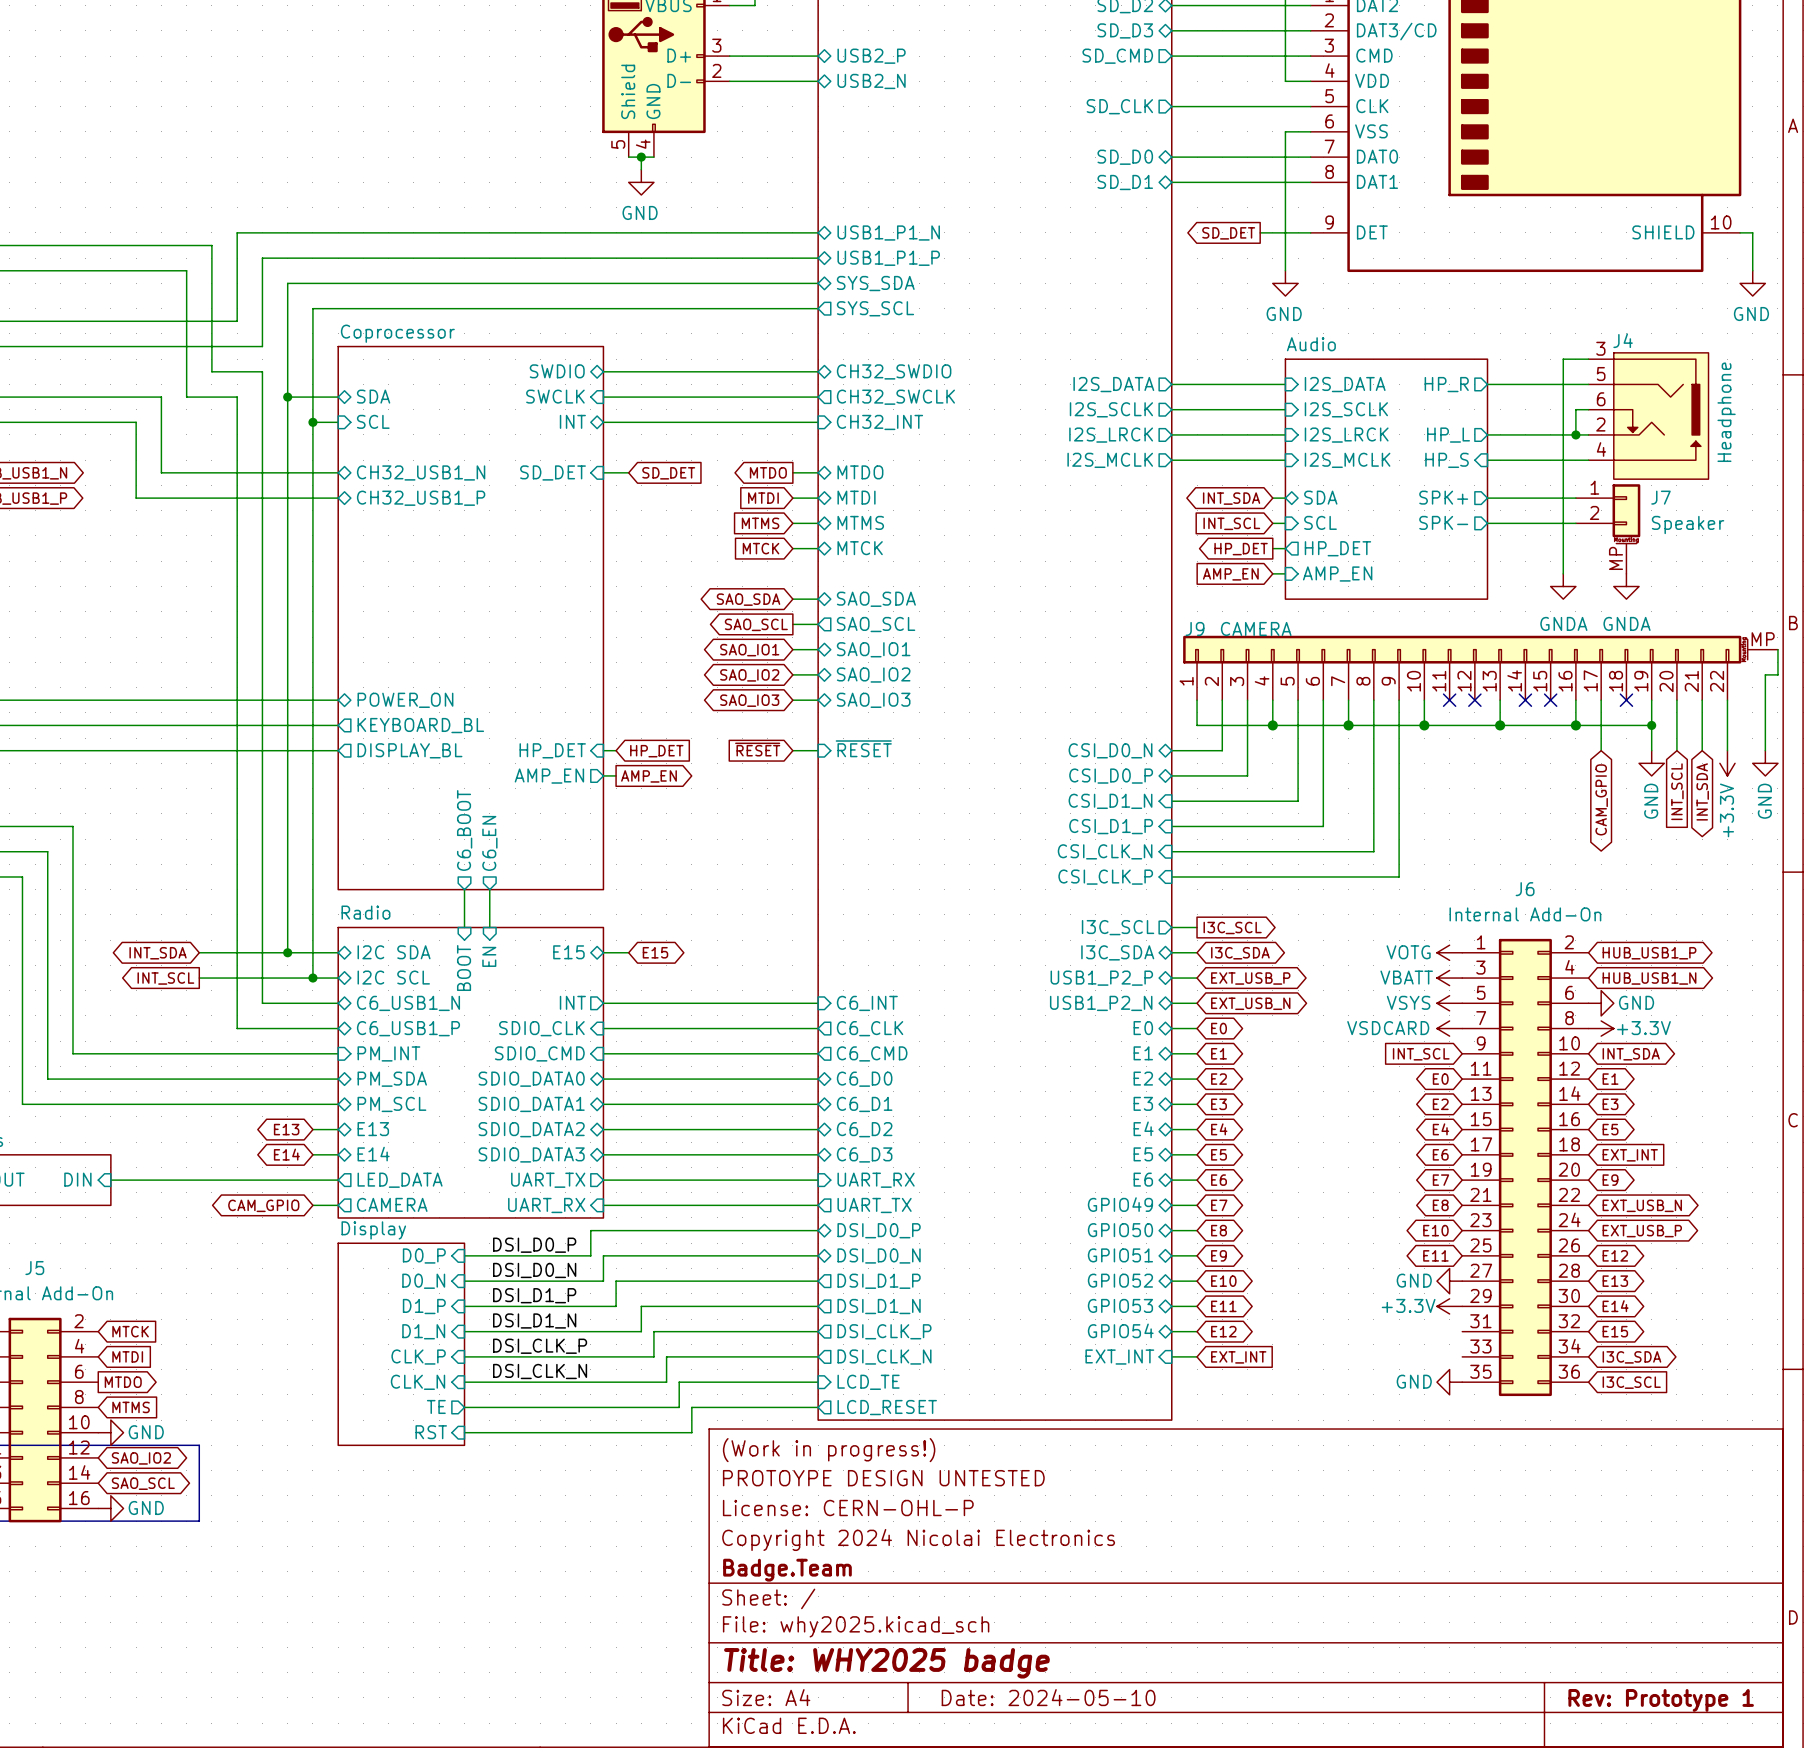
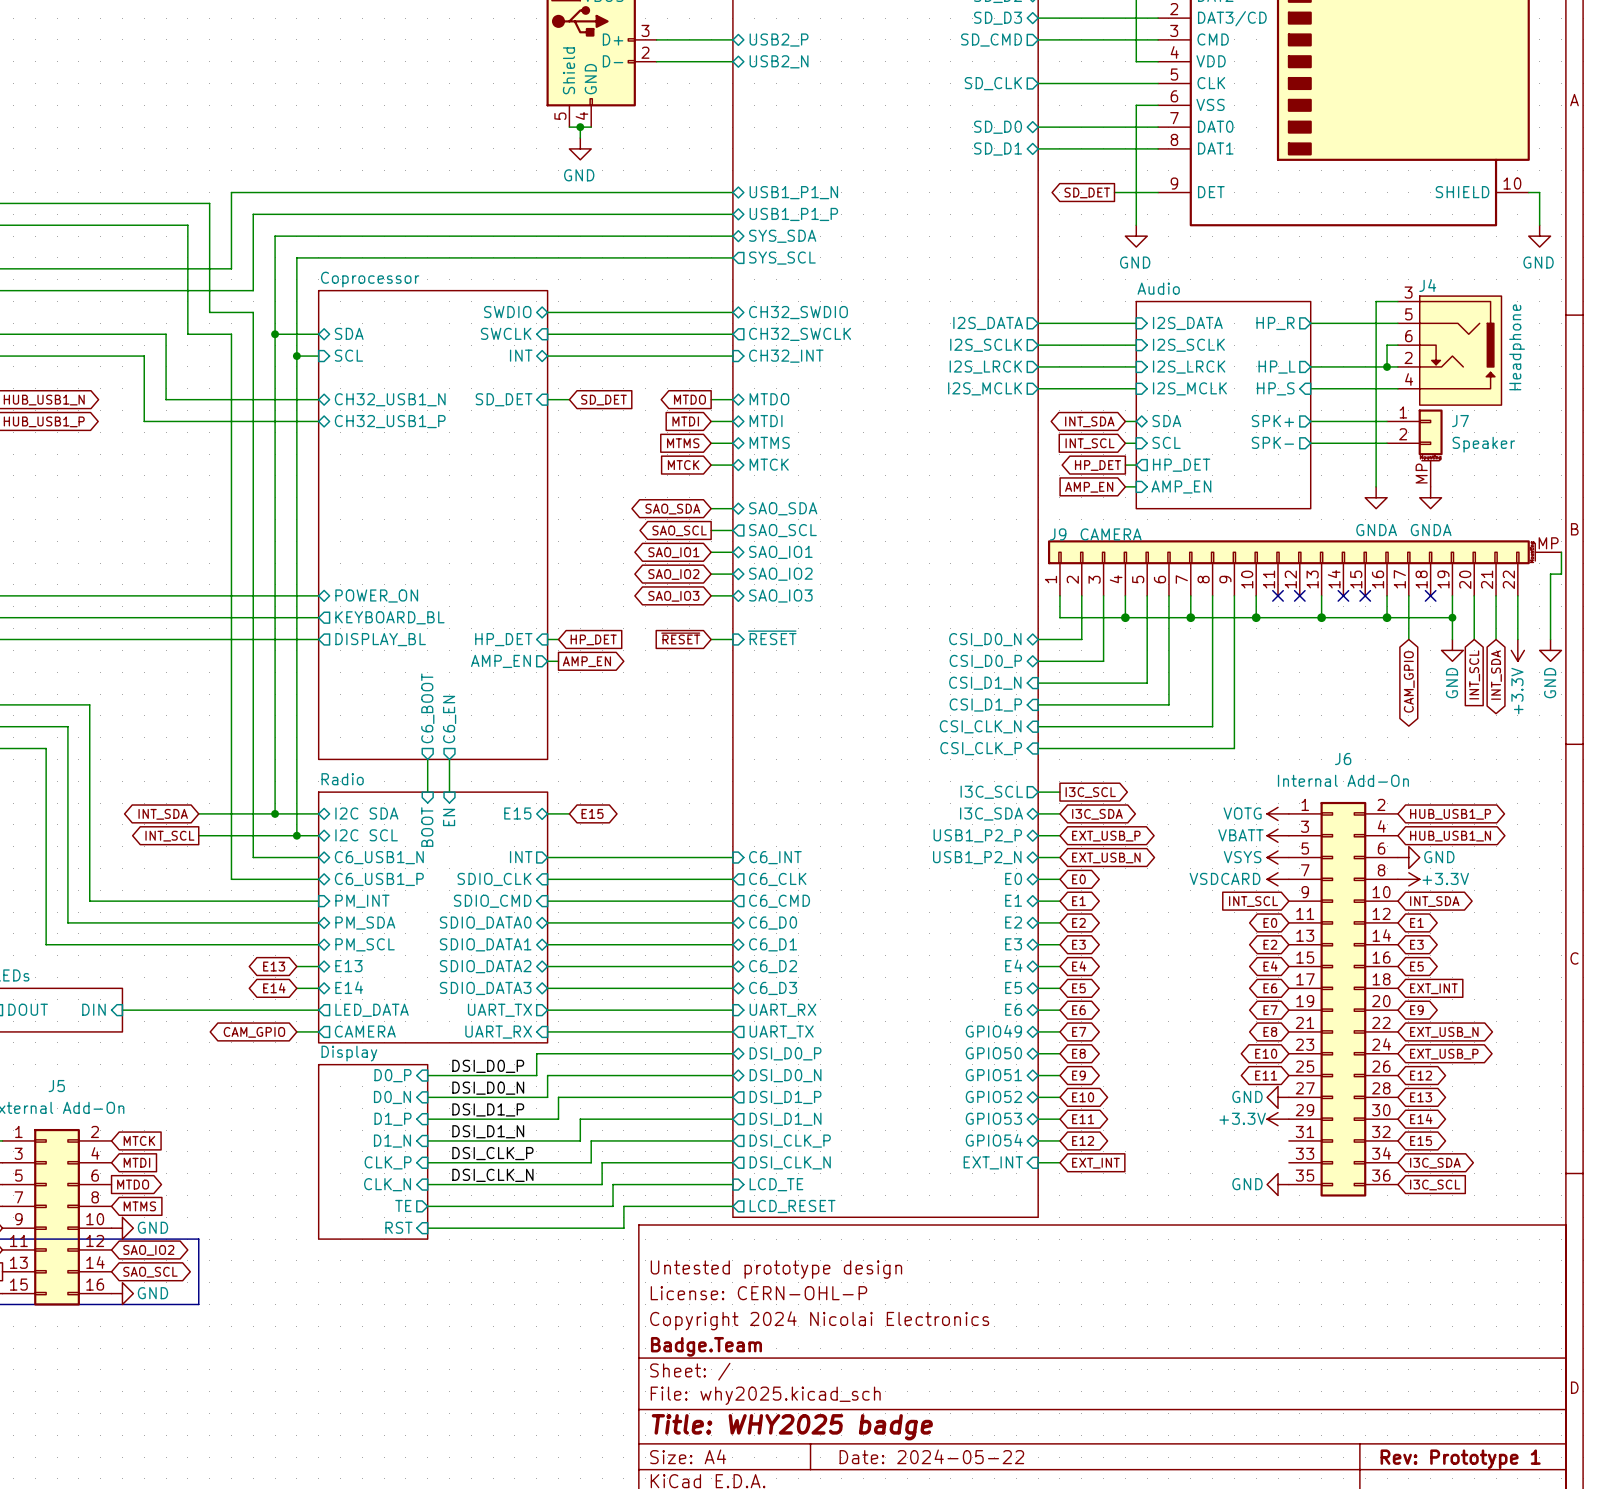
title block: (Work in progress!) (829, 1450) -> none
title block: PROTOYPE DESIGN UNTESTED (883, 1478) -> Untested prototype design (776, 1269)
title block: Date: 2024-05-10 (1048, 1697) -> Date: 2024-05-22 (931, 1456)

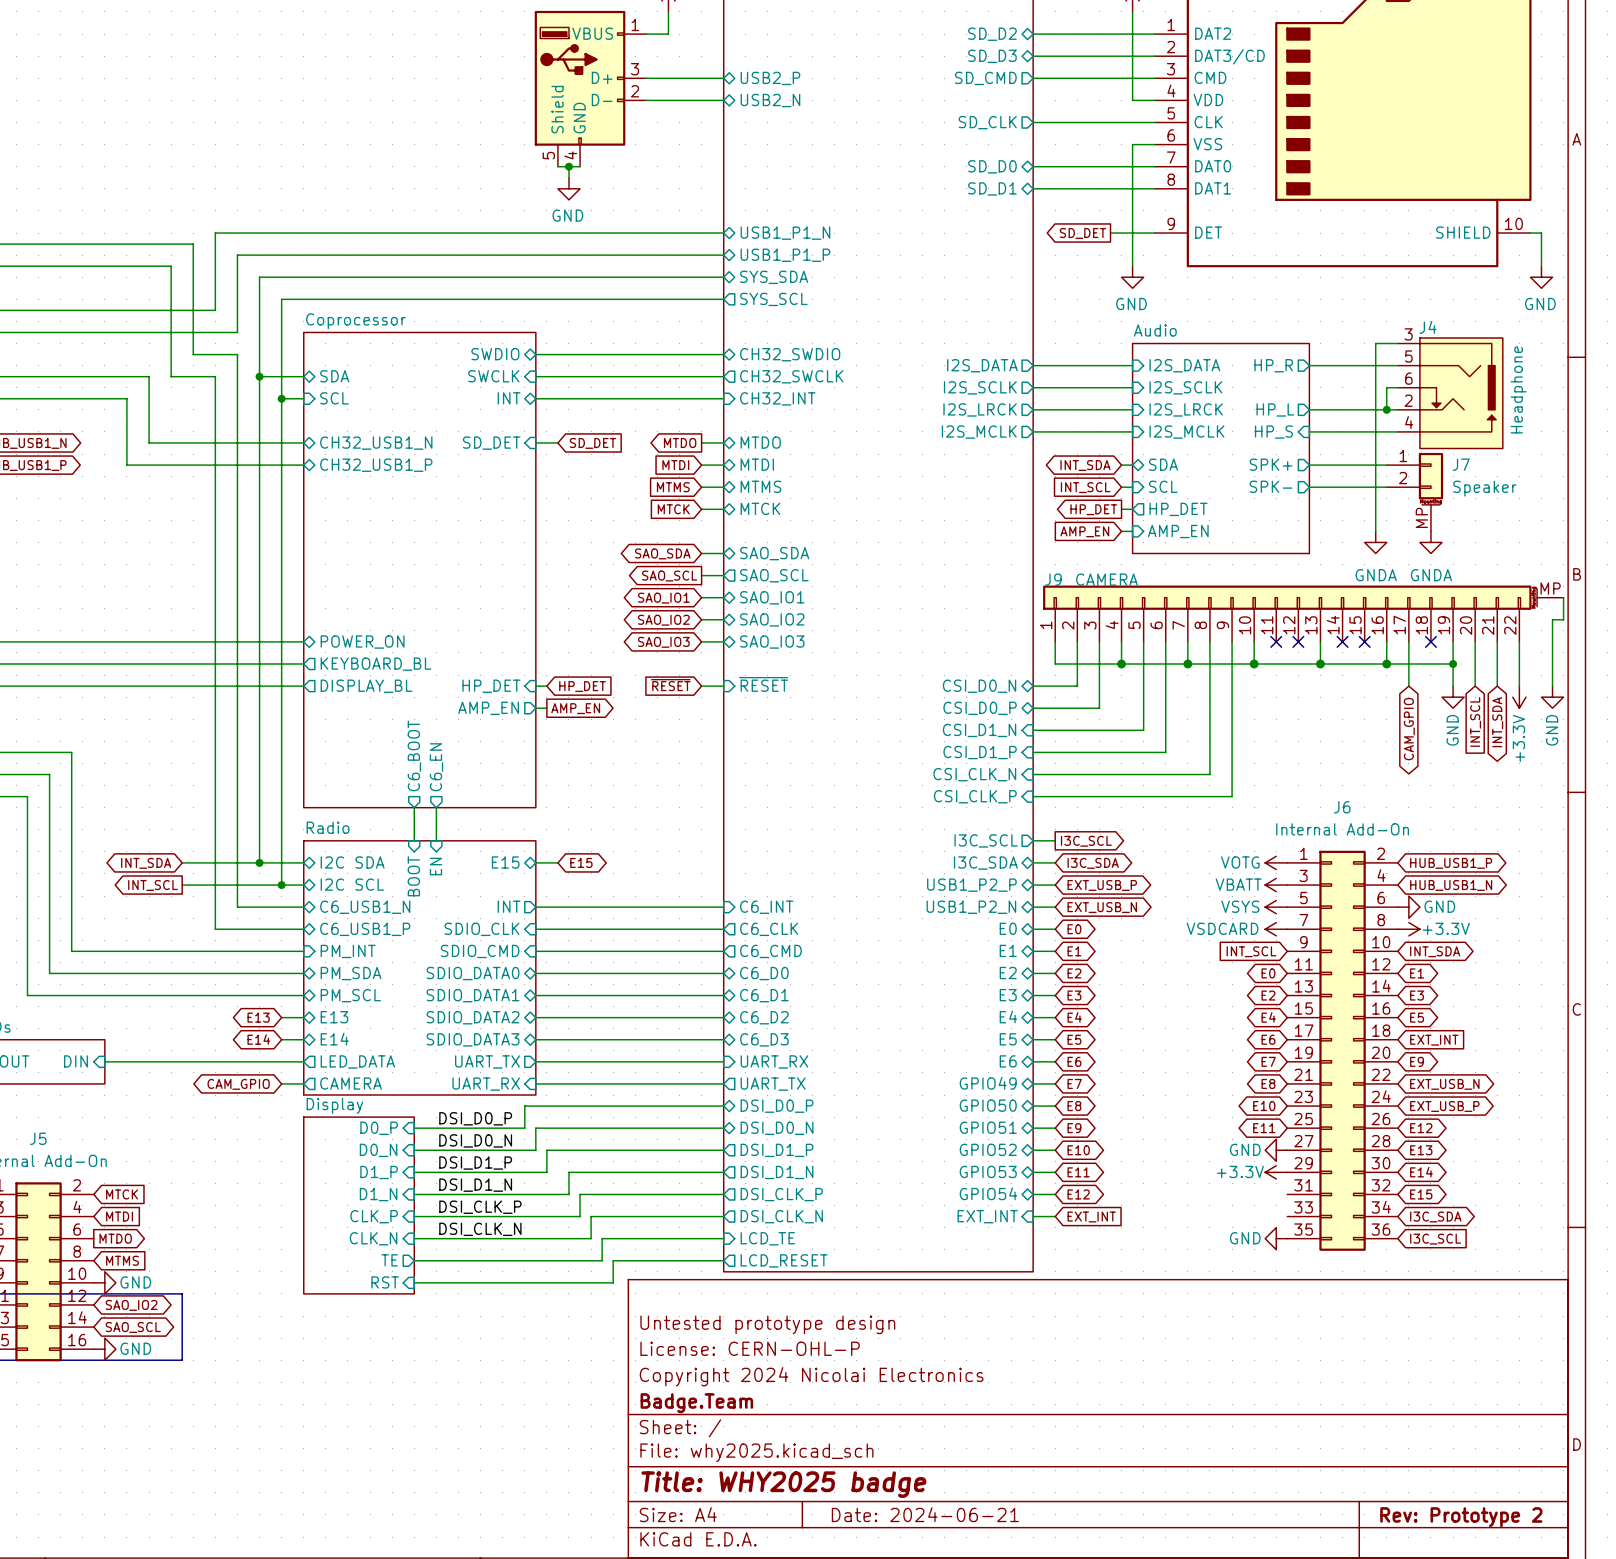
title block: Date: 2024-05-22 (931, 1456) -> Date: 2024-06-21 (925, 1514)
title block: Rev: Prototype 1 (1460, 1459) -> Rev: Prototype 2 (1461, 1517)

